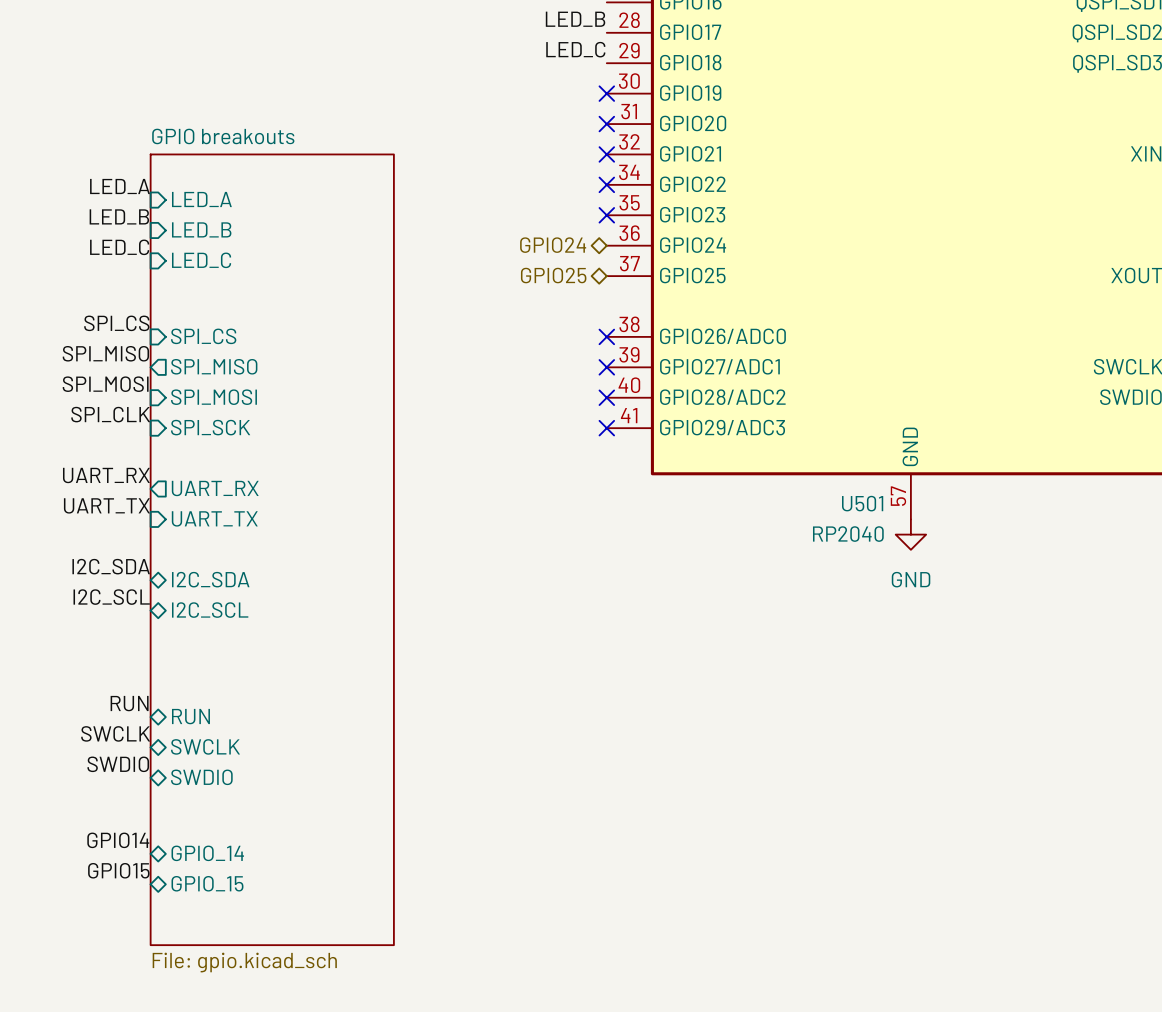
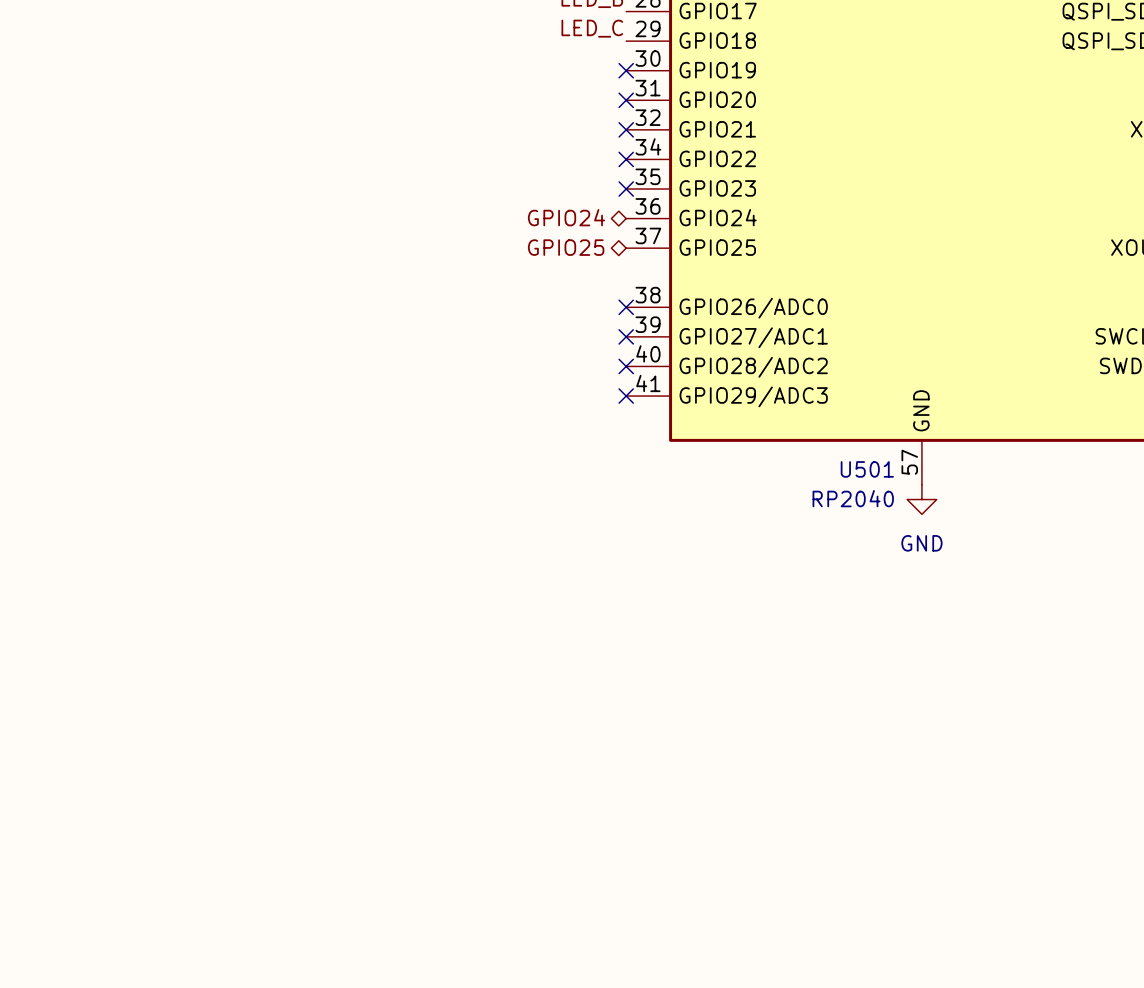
label: LED_A (119, 186) -> none
sheet pin: LED_A (201, 199) -> none
label: LED_B (119, 216) -> none
sheet pin: LED_B (201, 229) -> none
label: LED_C (119, 247) -> none
sheet pin: LED_C (201, 260) -> none
label: SPI_CS (116, 323) -> none
sheet pin: SPI_CS (203, 336) -> none
label: SPI_MISO (105, 353) -> none
sheet pin: SPI_MISO (214, 366) -> none
label: SPI_MOSI (105, 384) -> none
sheet pin: SPI_MOSI (214, 397) -> none
label: SPI_CLK (110, 414) -> none
sheet pin: SPI_SCK (210, 427) -> none
label: UART_RX (106, 475) -> none
sheet pin: UART_RX (215, 488) -> none
label: UART_TX (106, 505) -> none
sheet pin: UART_TX (214, 518) -> none
sheet GPIO breakouts: File: gpio.kicad_sch (272, 549) -> none
label: I2C_SDA (111, 566) -> none
sheet pin: I2C_SDA (210, 579) -> none
label: I2C_SCL (111, 597) -> none
sheet pin: I2C_SCL (210, 610) -> none
label: RUN (129, 703) -> none
sheet pin: RUN (190, 716) -> none
label: SWCLK (115, 733) -> none
sheet pin: SWCLK (205, 746) -> none
label: SWDIO (118, 764) -> none
sheet pin: SWDIO (201, 777) -> none
label: GPIO14 (118, 840) -> none
sheet pin: GPIO_14 (207, 853) -> none
label: GPIO15 (118, 870) -> none
sheet pin: GPIO_15 (207, 883) -> none

